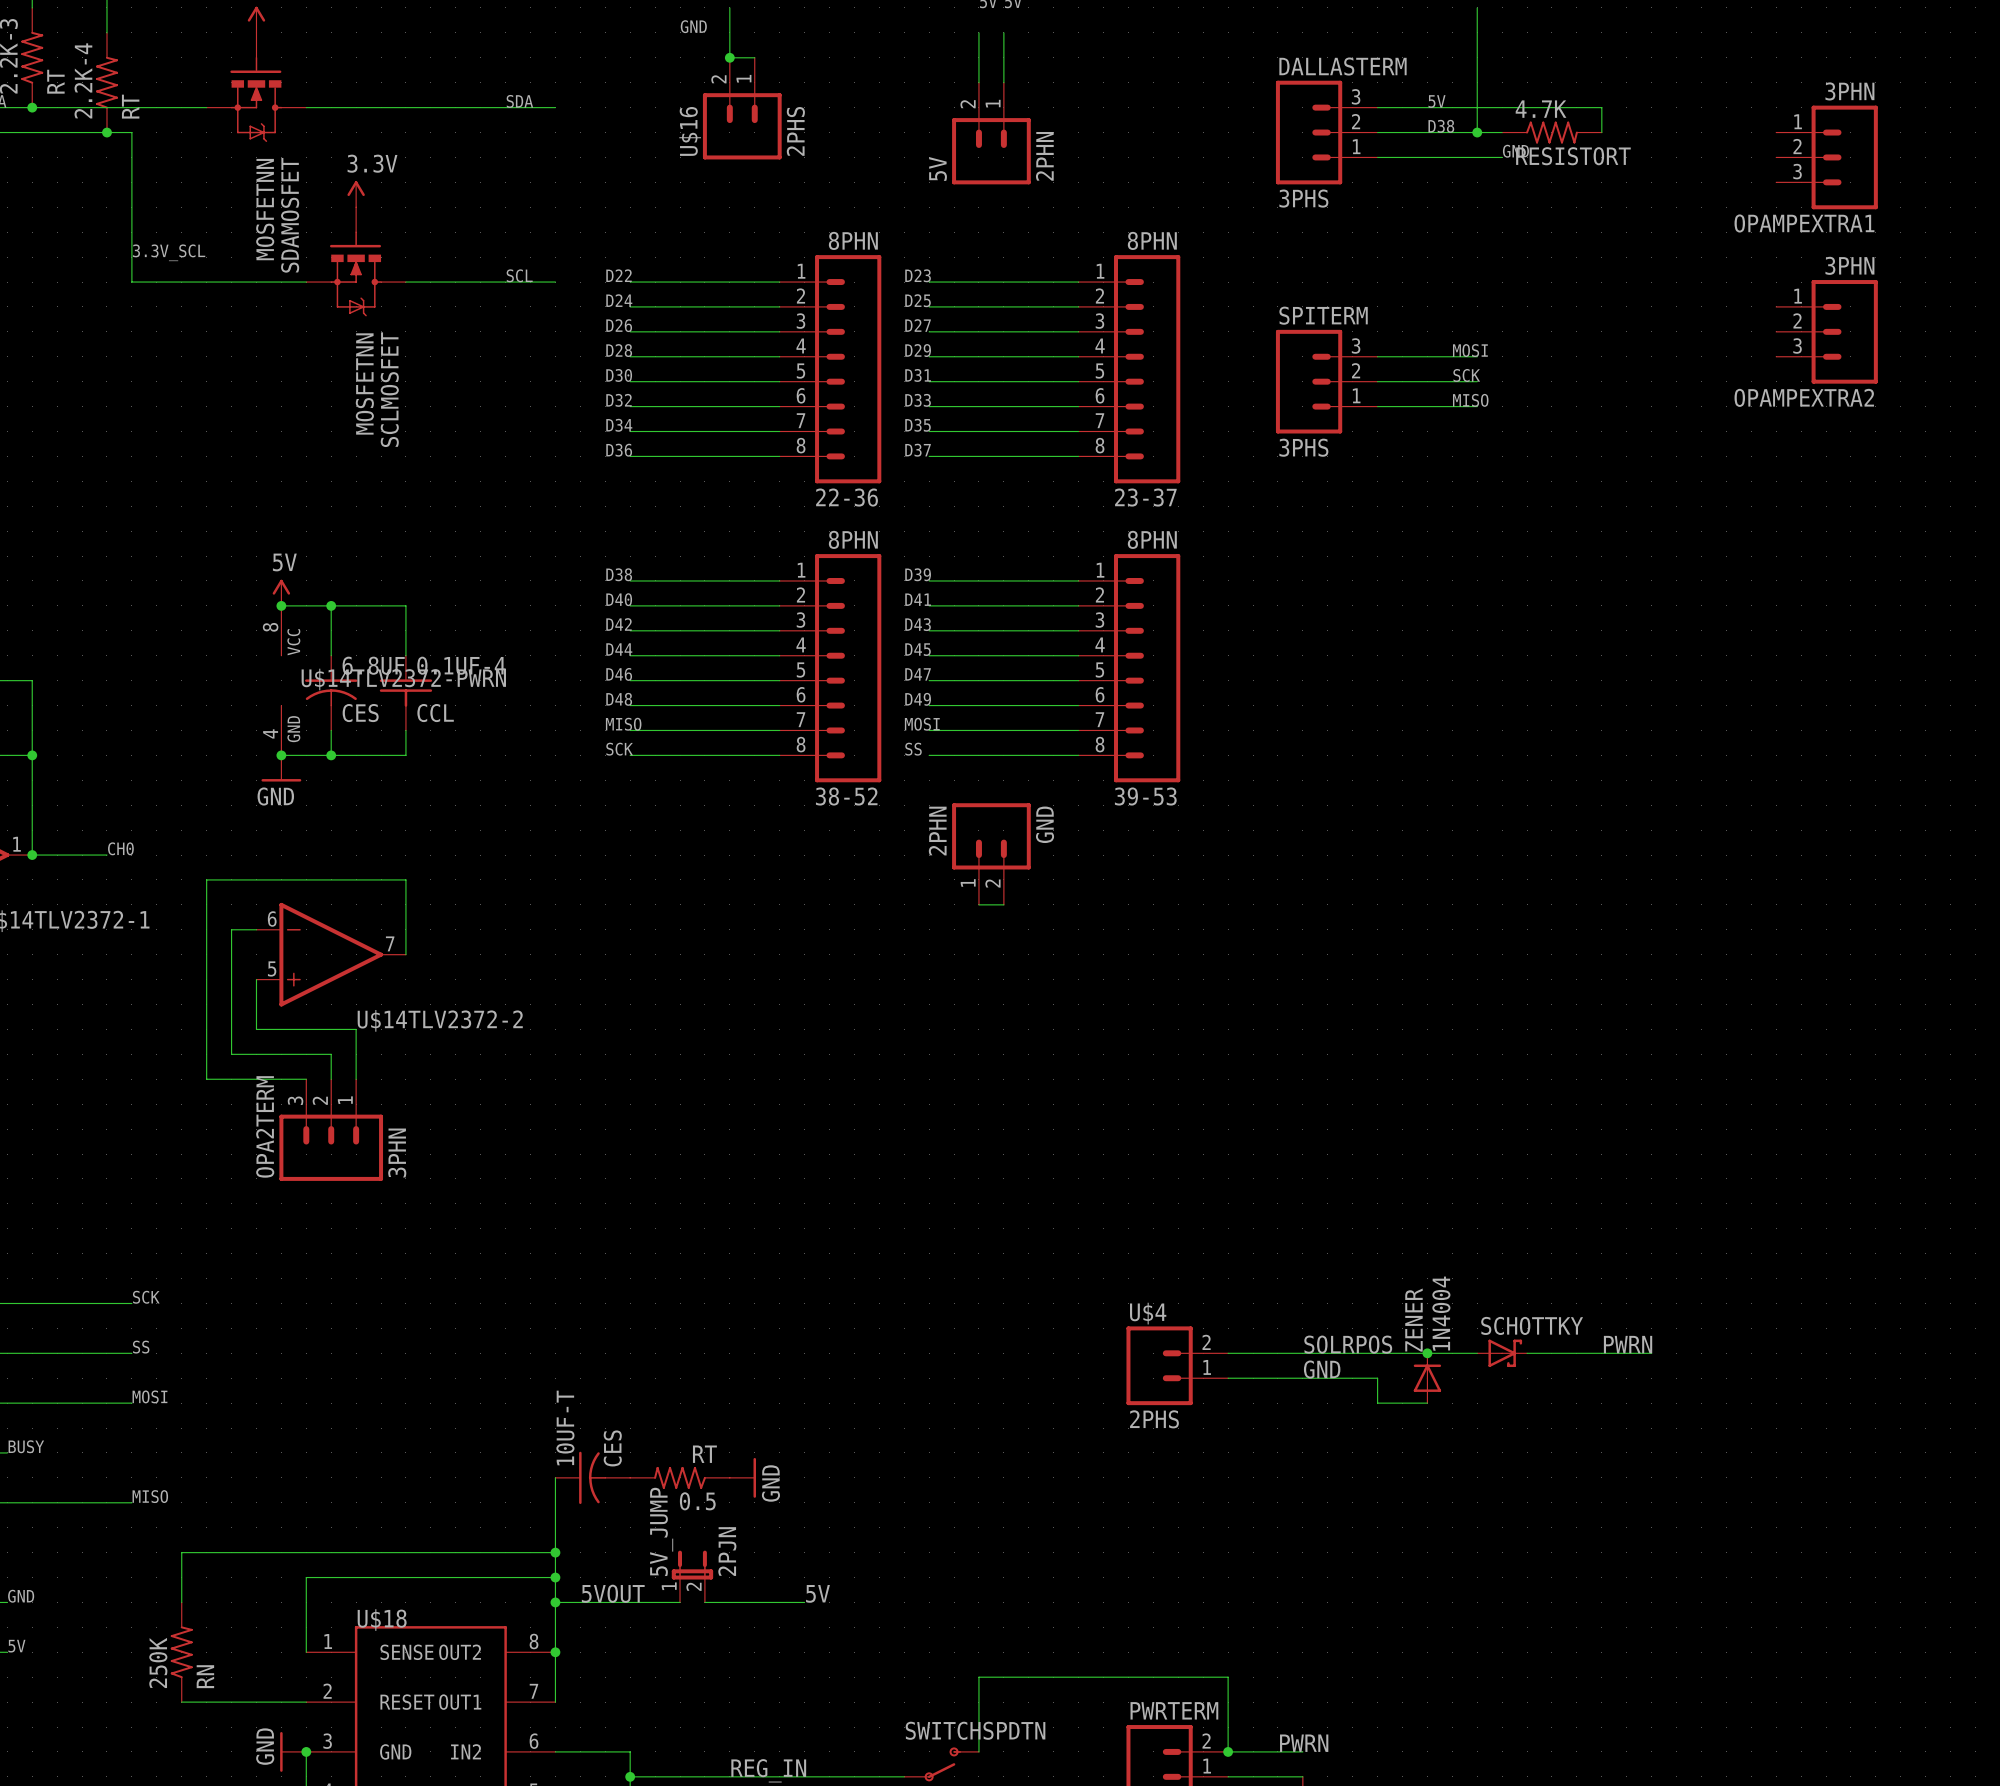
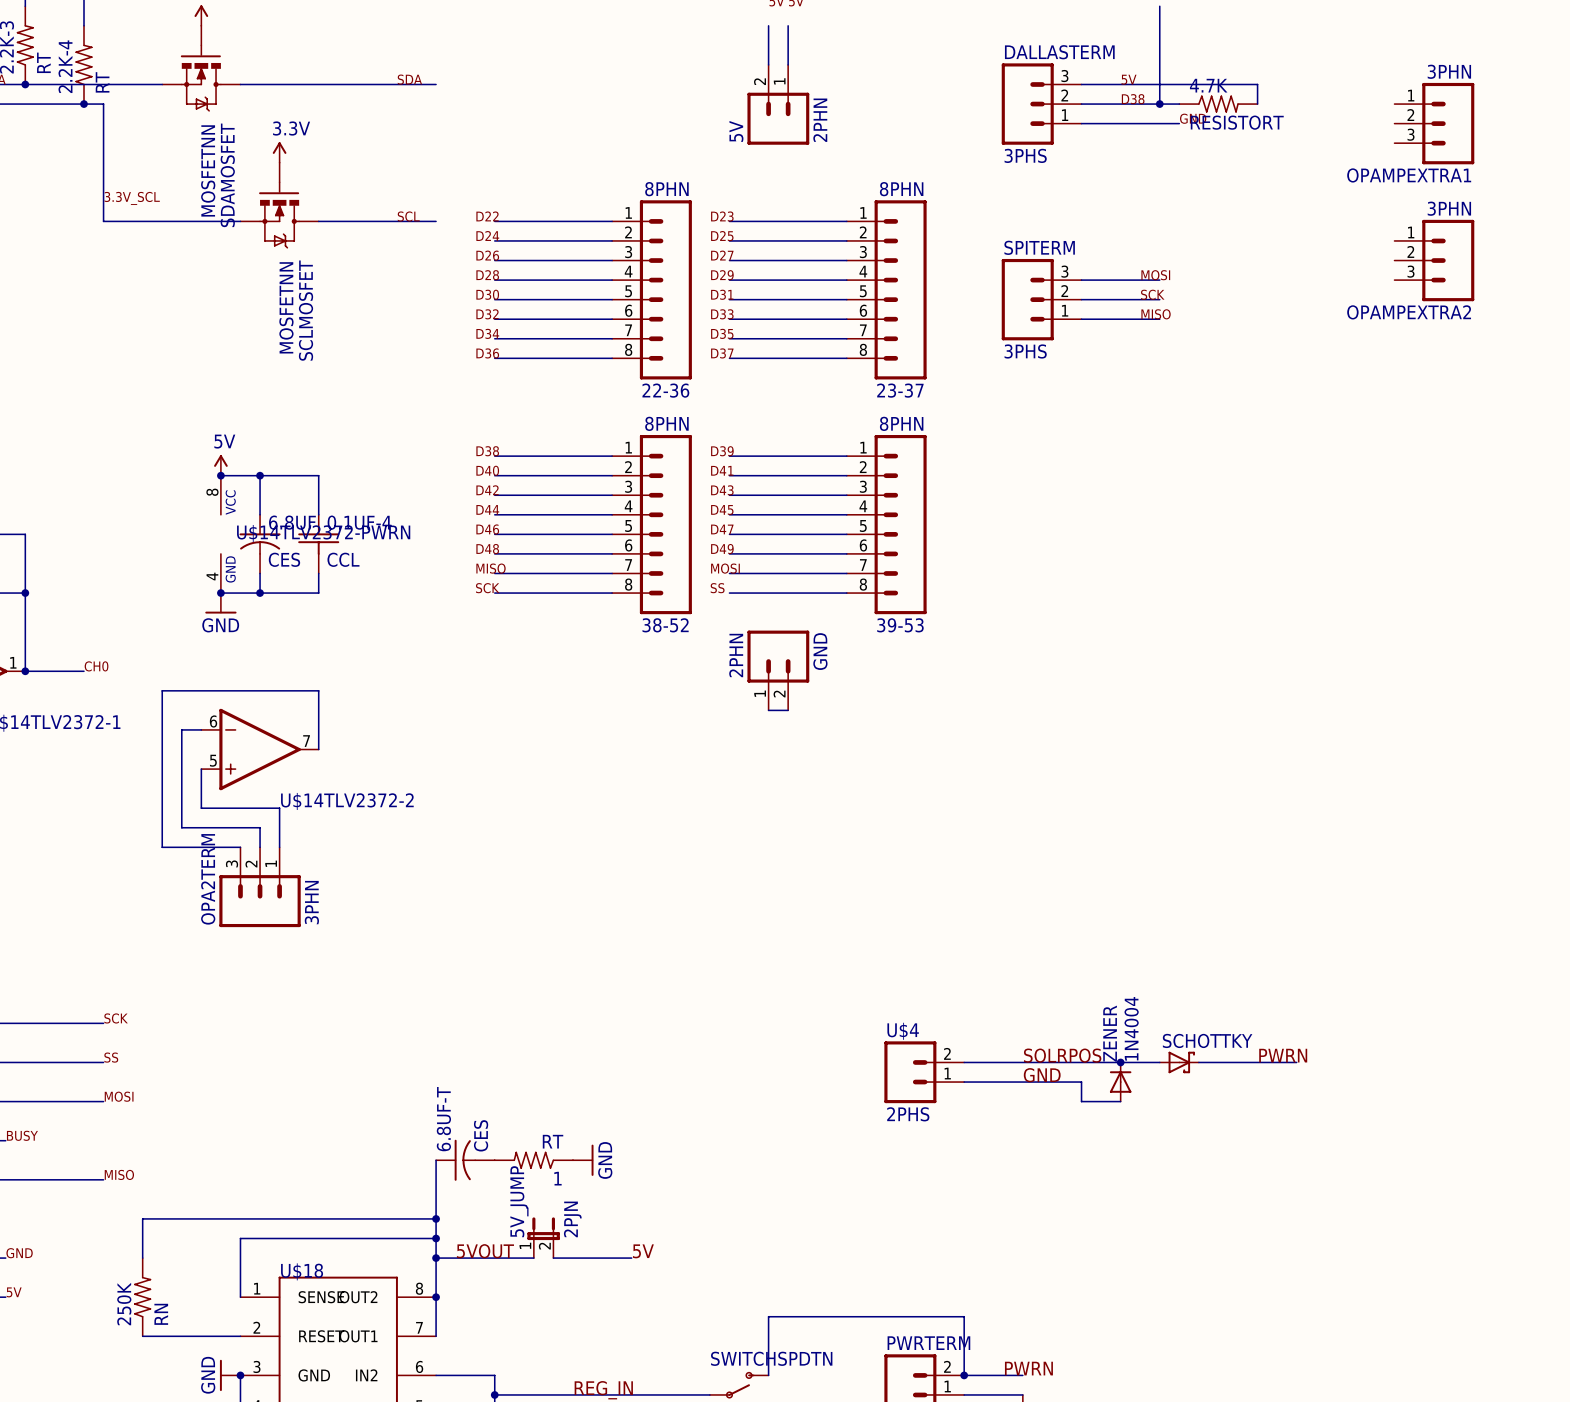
wire: (729, 7) (729, 57) (754, 57) -> none
label: GND (693, 26) -> none
junction: (729, 57) -> none
U$16: 2PHS (742, 108) -> none
10UF-T name: 10UF-T (565, 1427) -> 6.8UF-T (443, 1119)
0.5 name: 0.5 (697, 1501) -> 1 (557, 1178)

